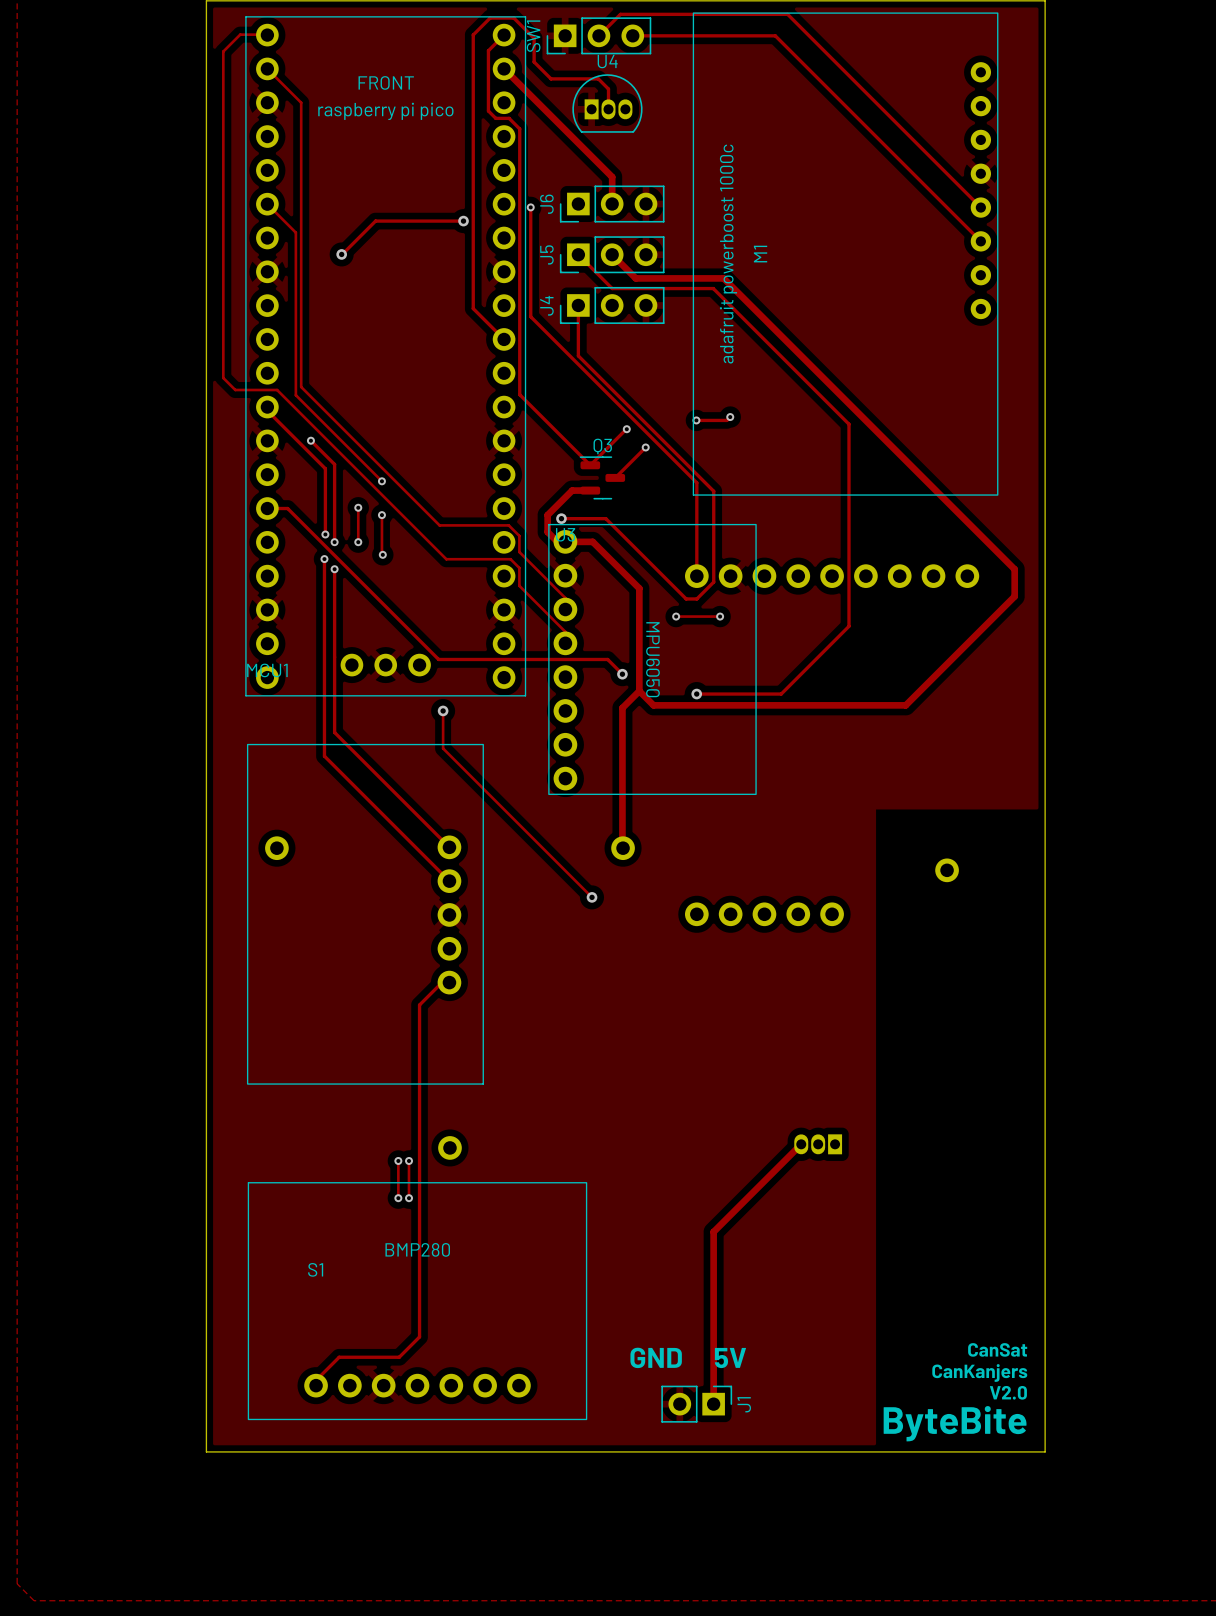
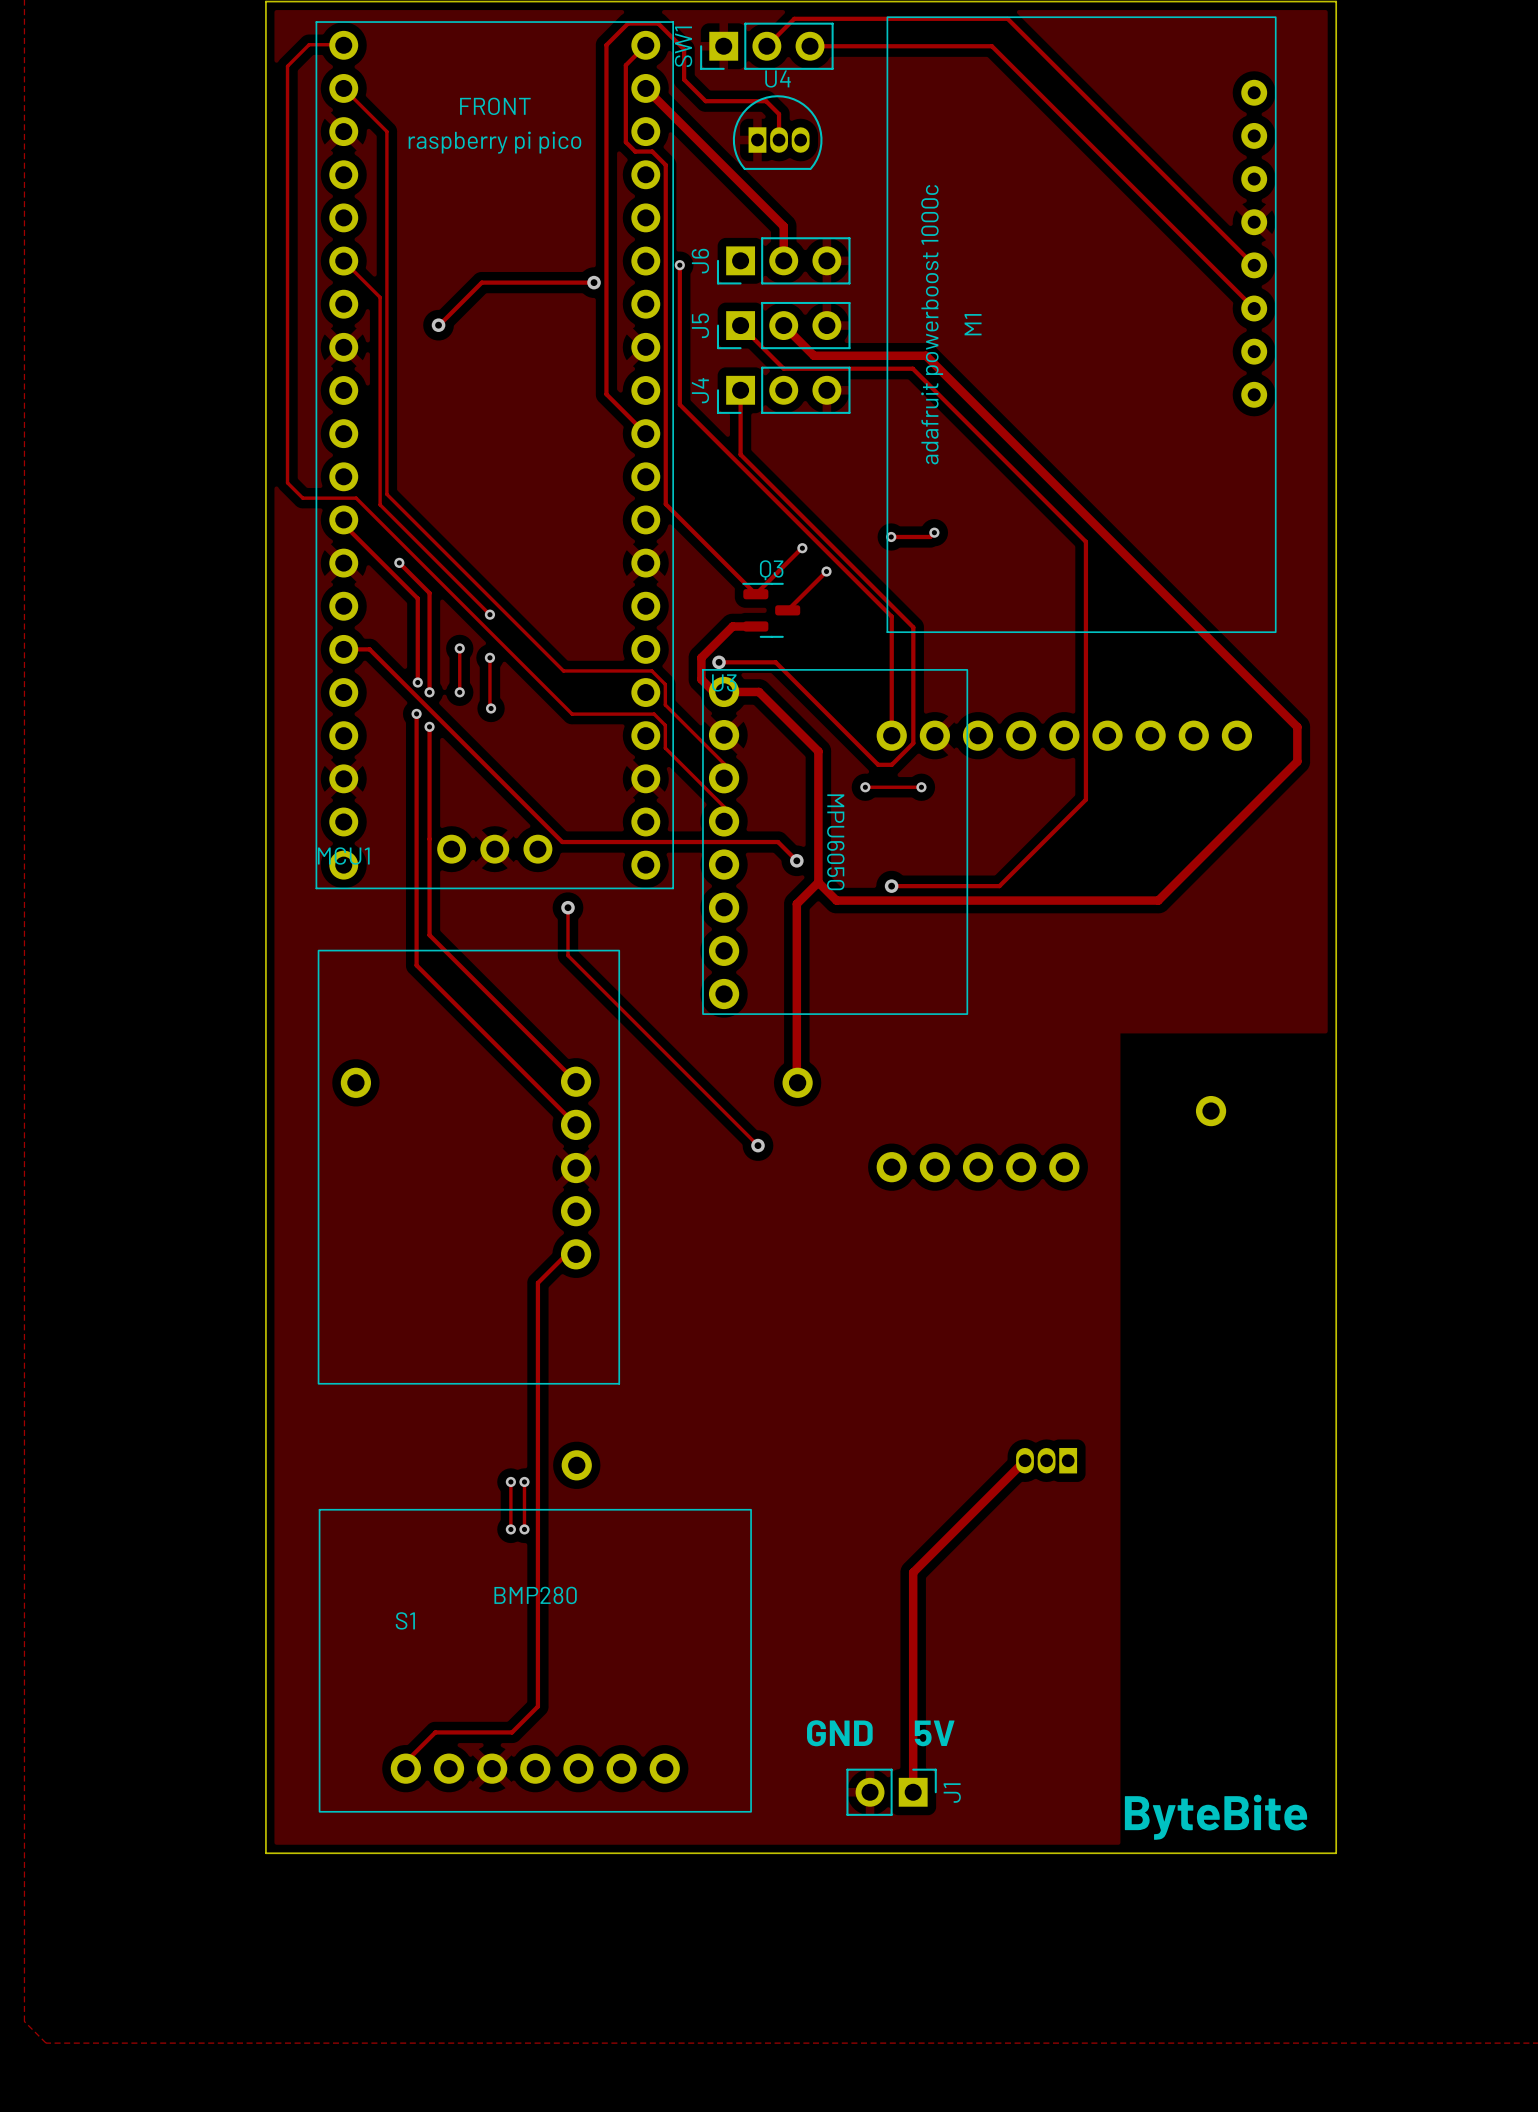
text: CanSat (997, 1349) -> none
text: CanKanjers (979, 1373) -> none
text: V2.0 (1008, 1392) -> none
text position: ByteBite (955, 1423) -> ByteBite (1216, 1817)

